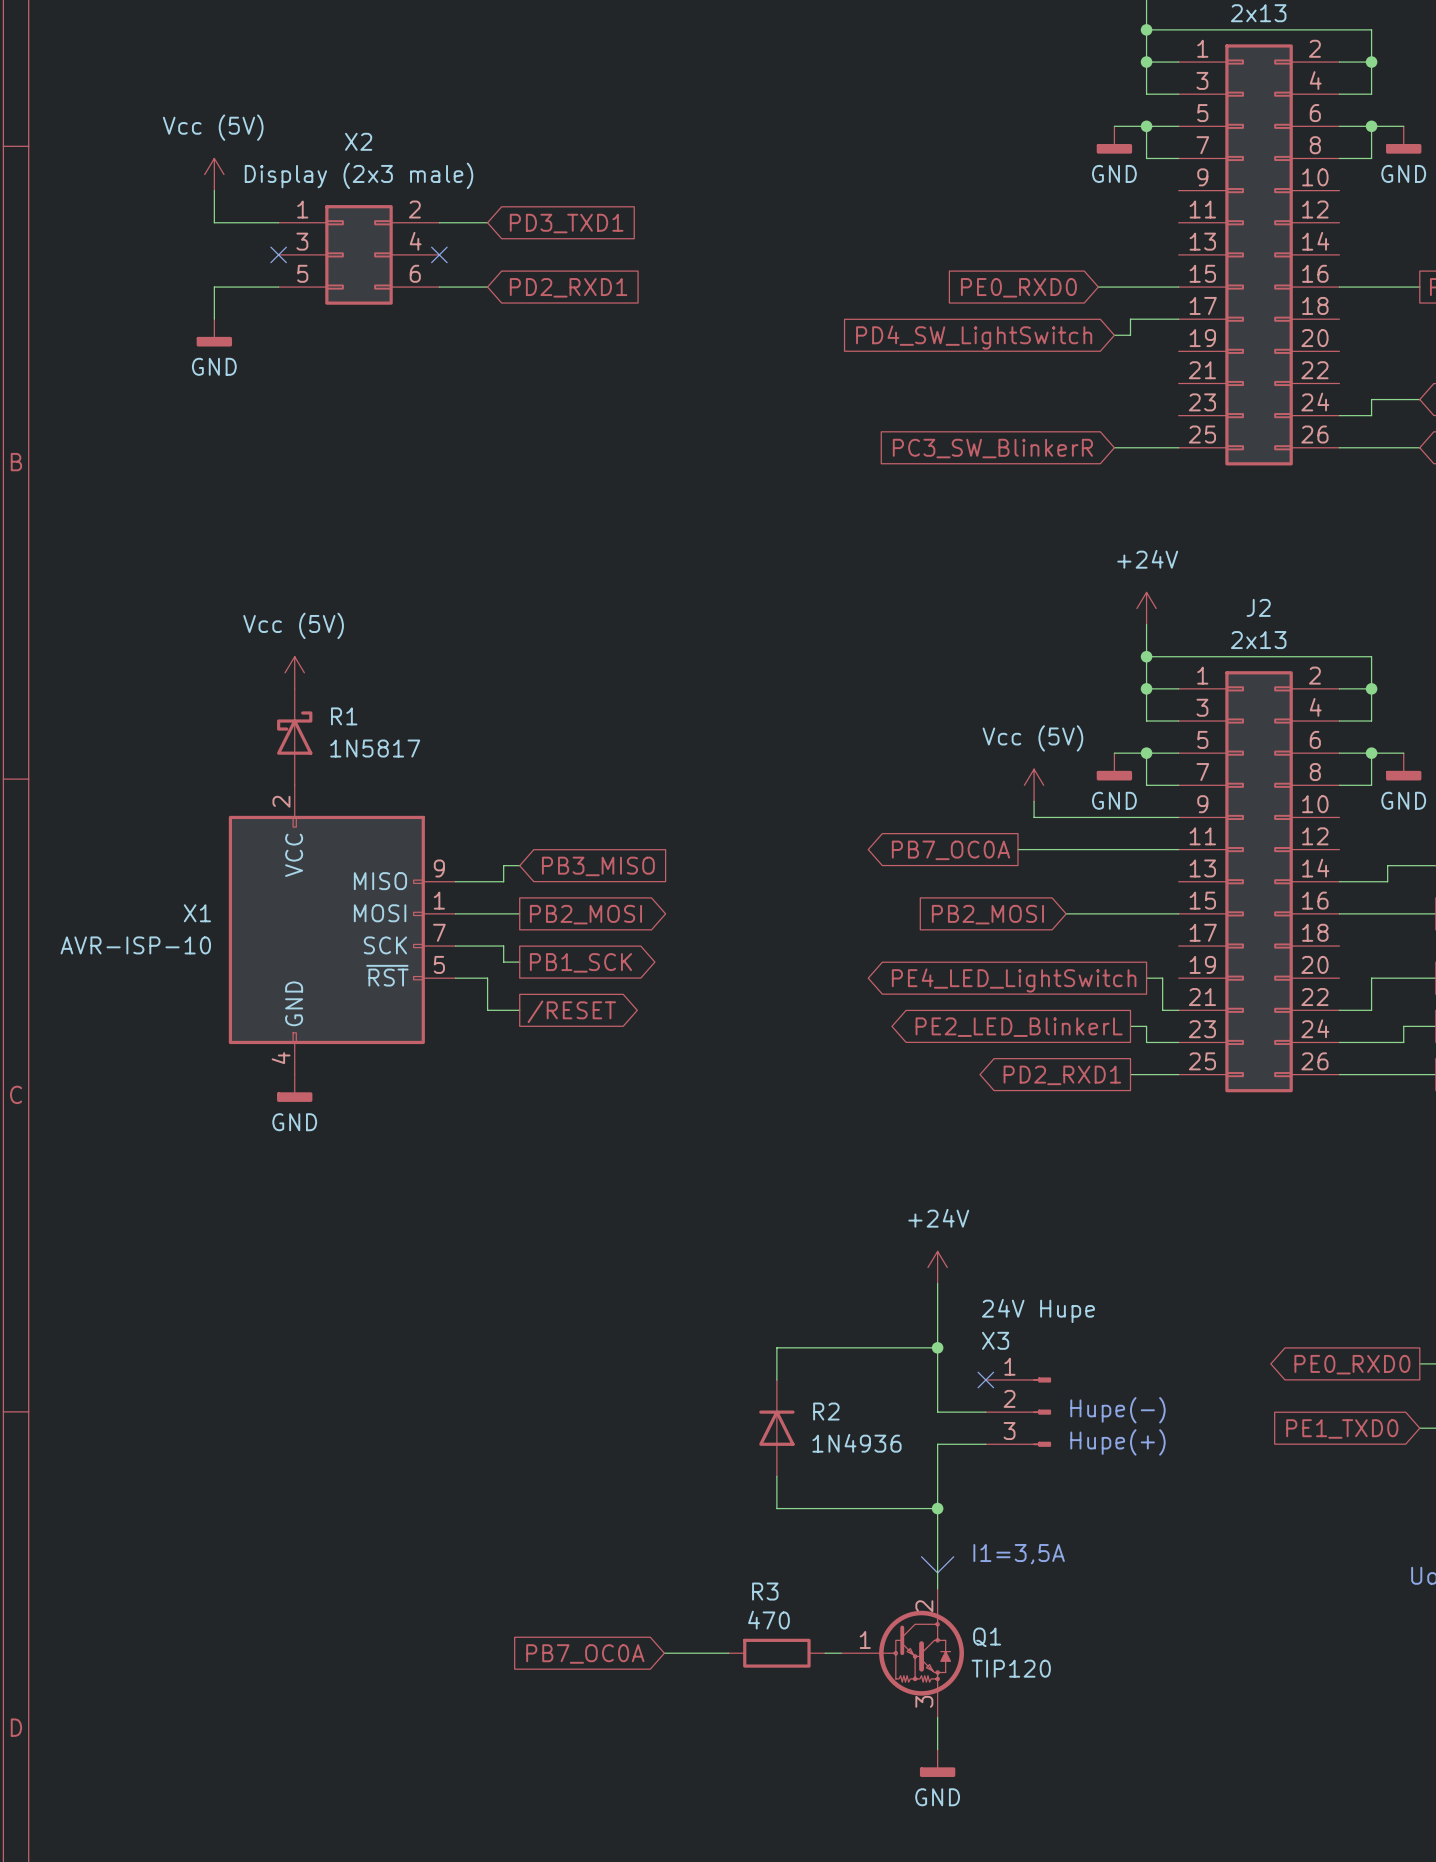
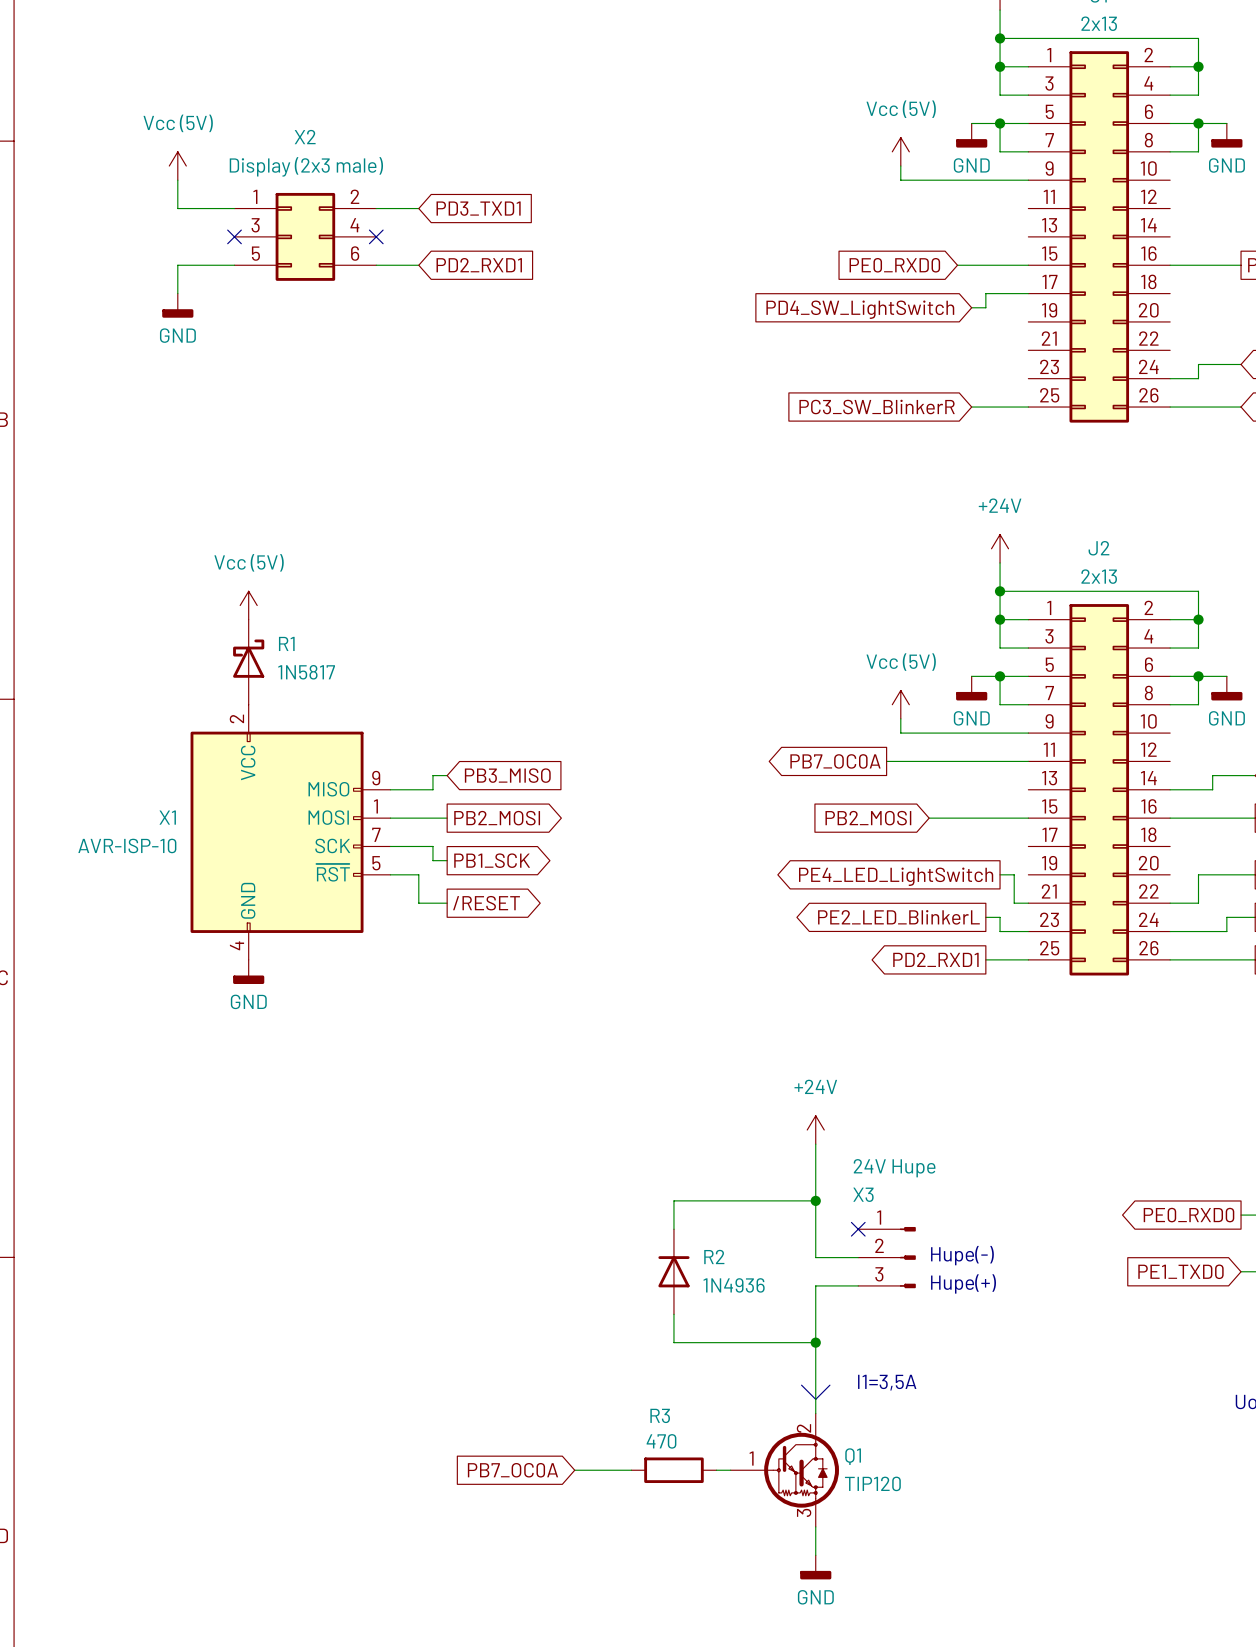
power symbol: none -> Vcc (5V) (900, 151)
wire: none -> (900, 166) (900, 180) (1028, 180)

